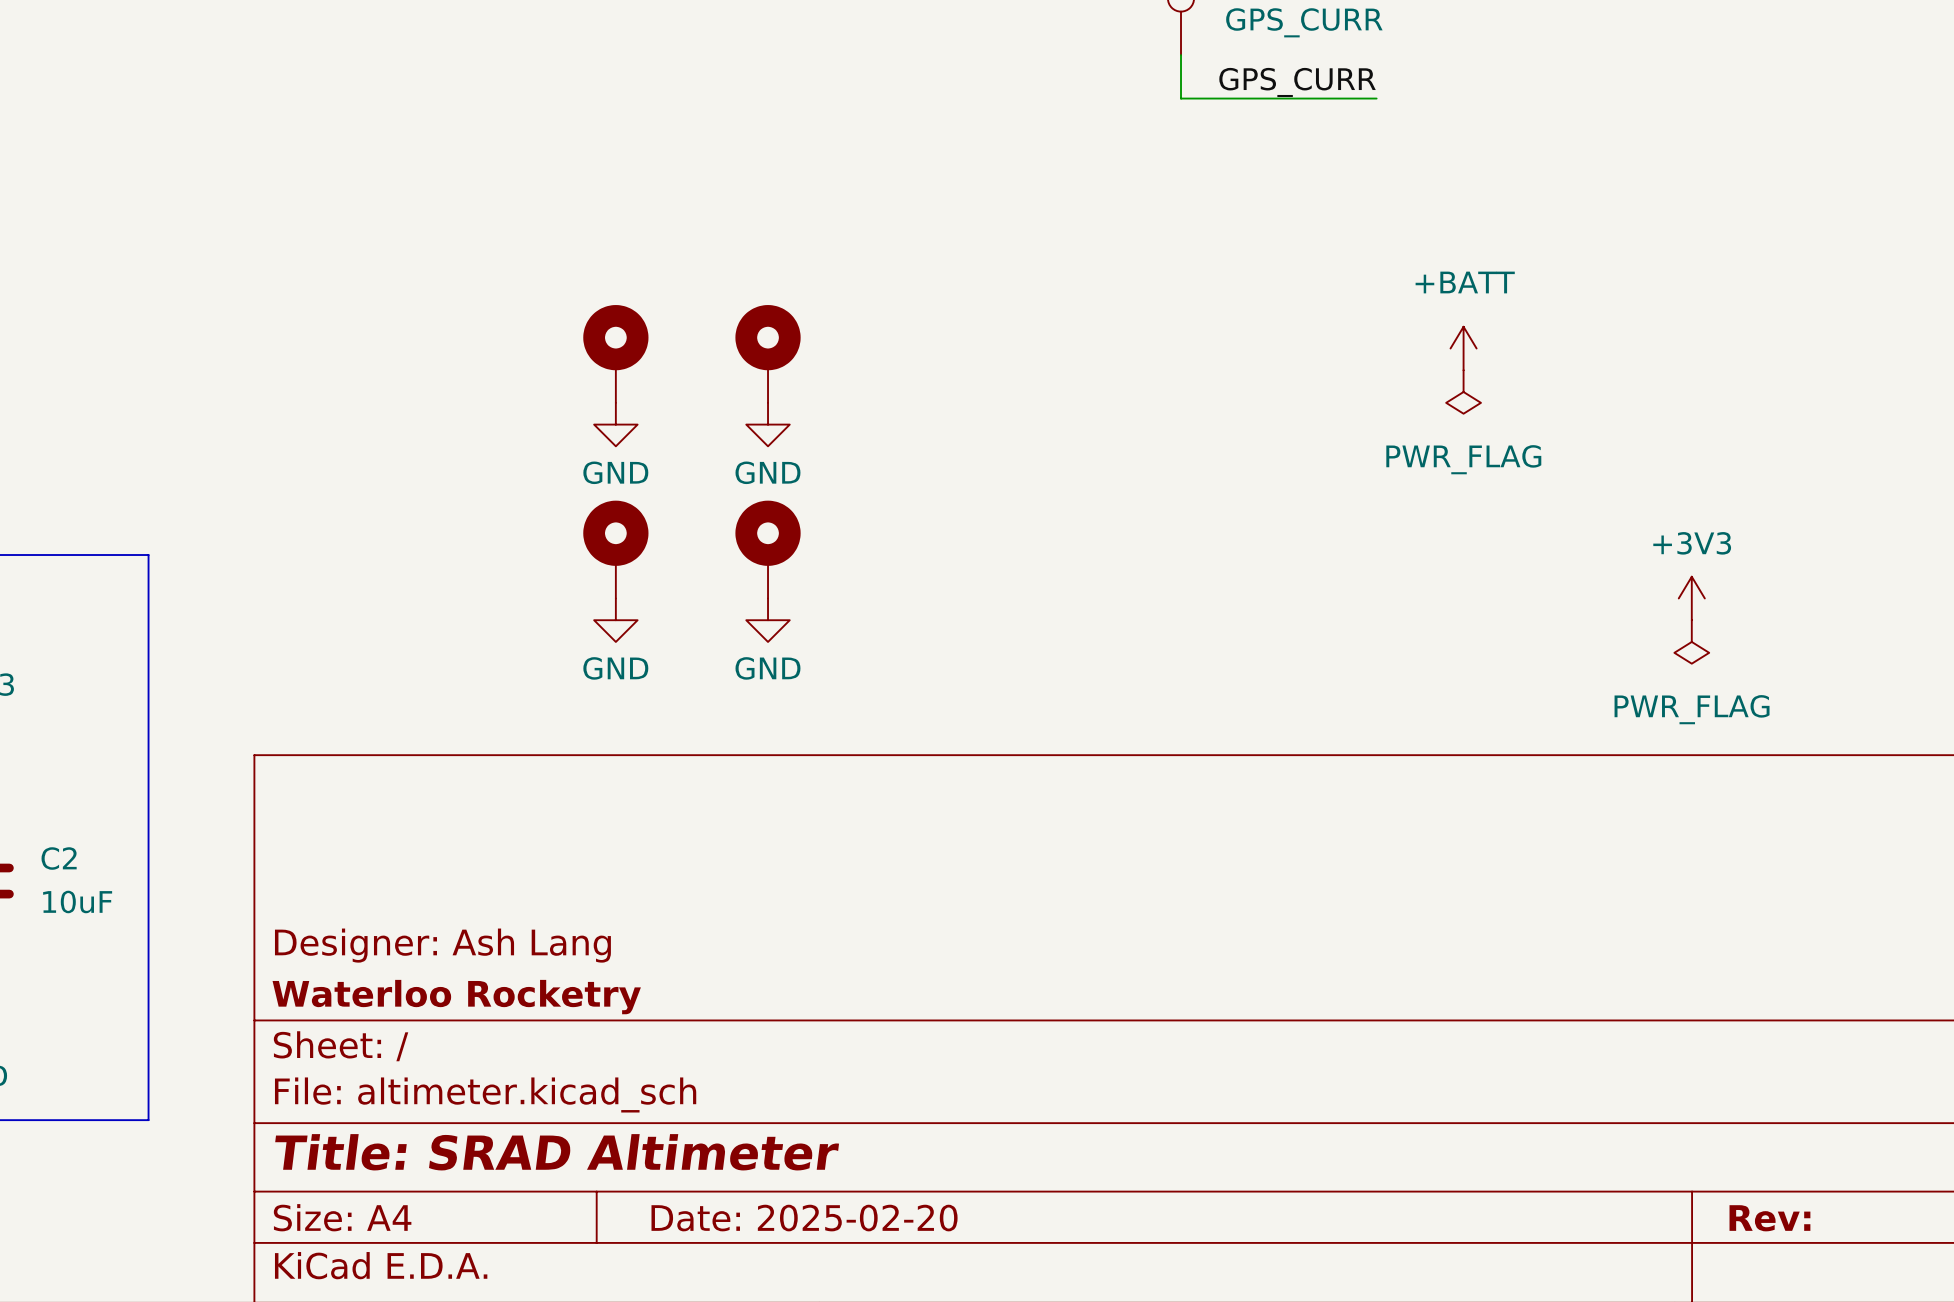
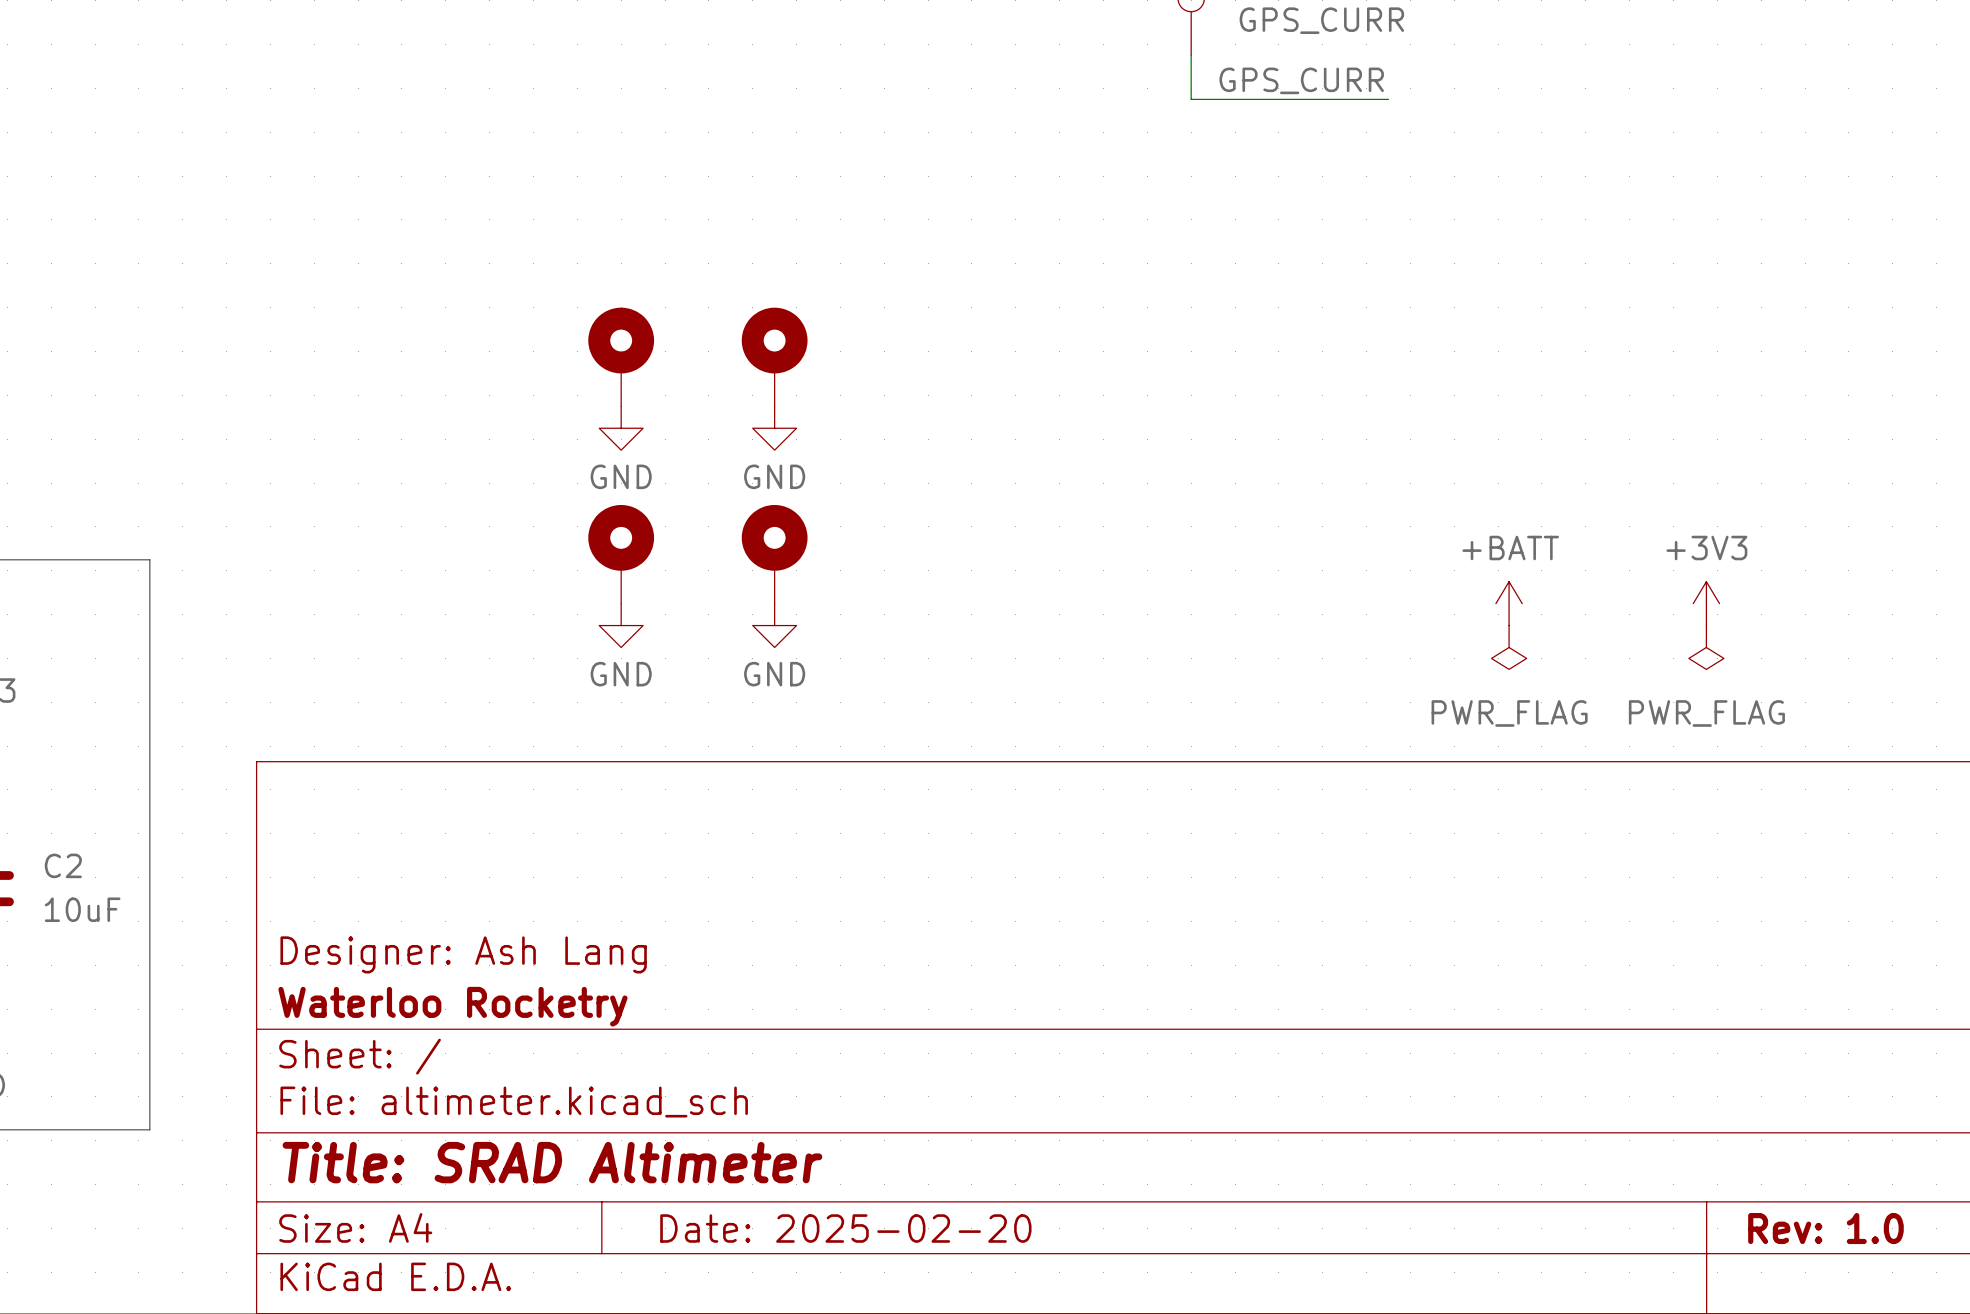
power symbol text position: +BATT (1465, 282) -> +BATT (1510, 548)
power symbol position: +BATT (1463, 348) -> +BATT (1509, 603)
power symbol position: PWR_FLAG (1463, 391) -> PWR_FLAG (1509, 647)
title block: Rev: (1769, 1218) -> Rev: 1.0 (1825, 1228)

